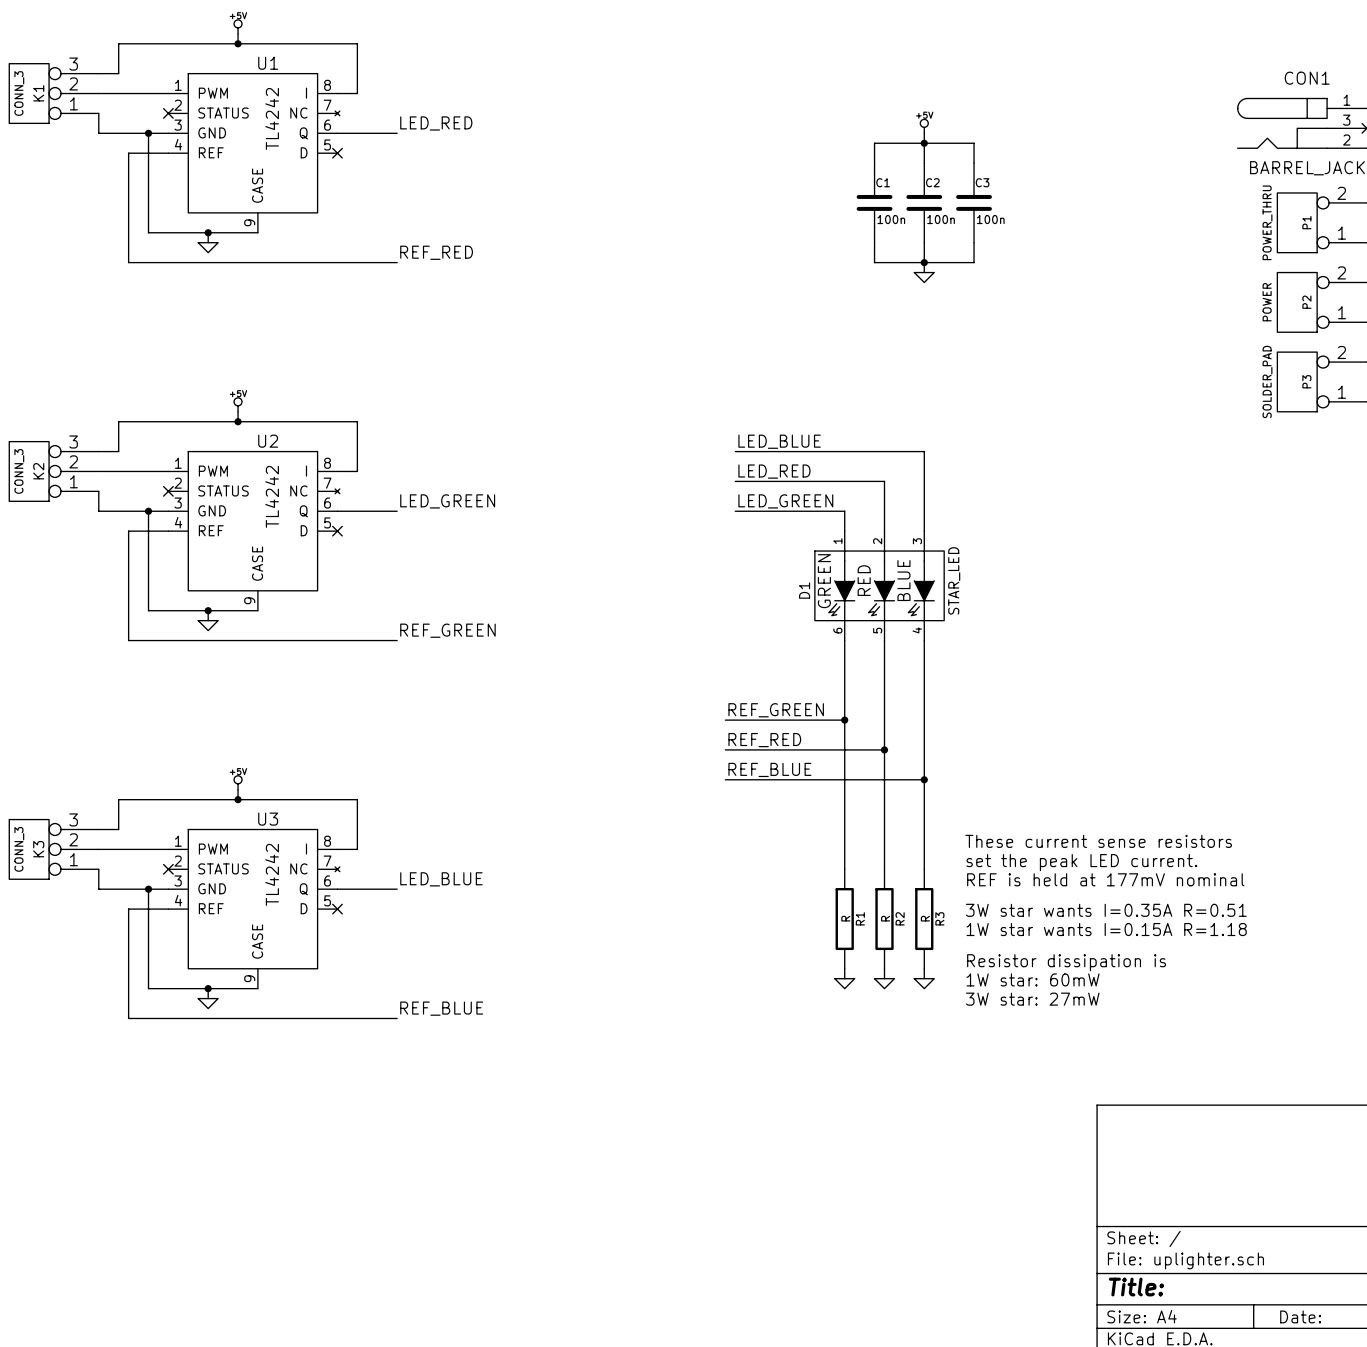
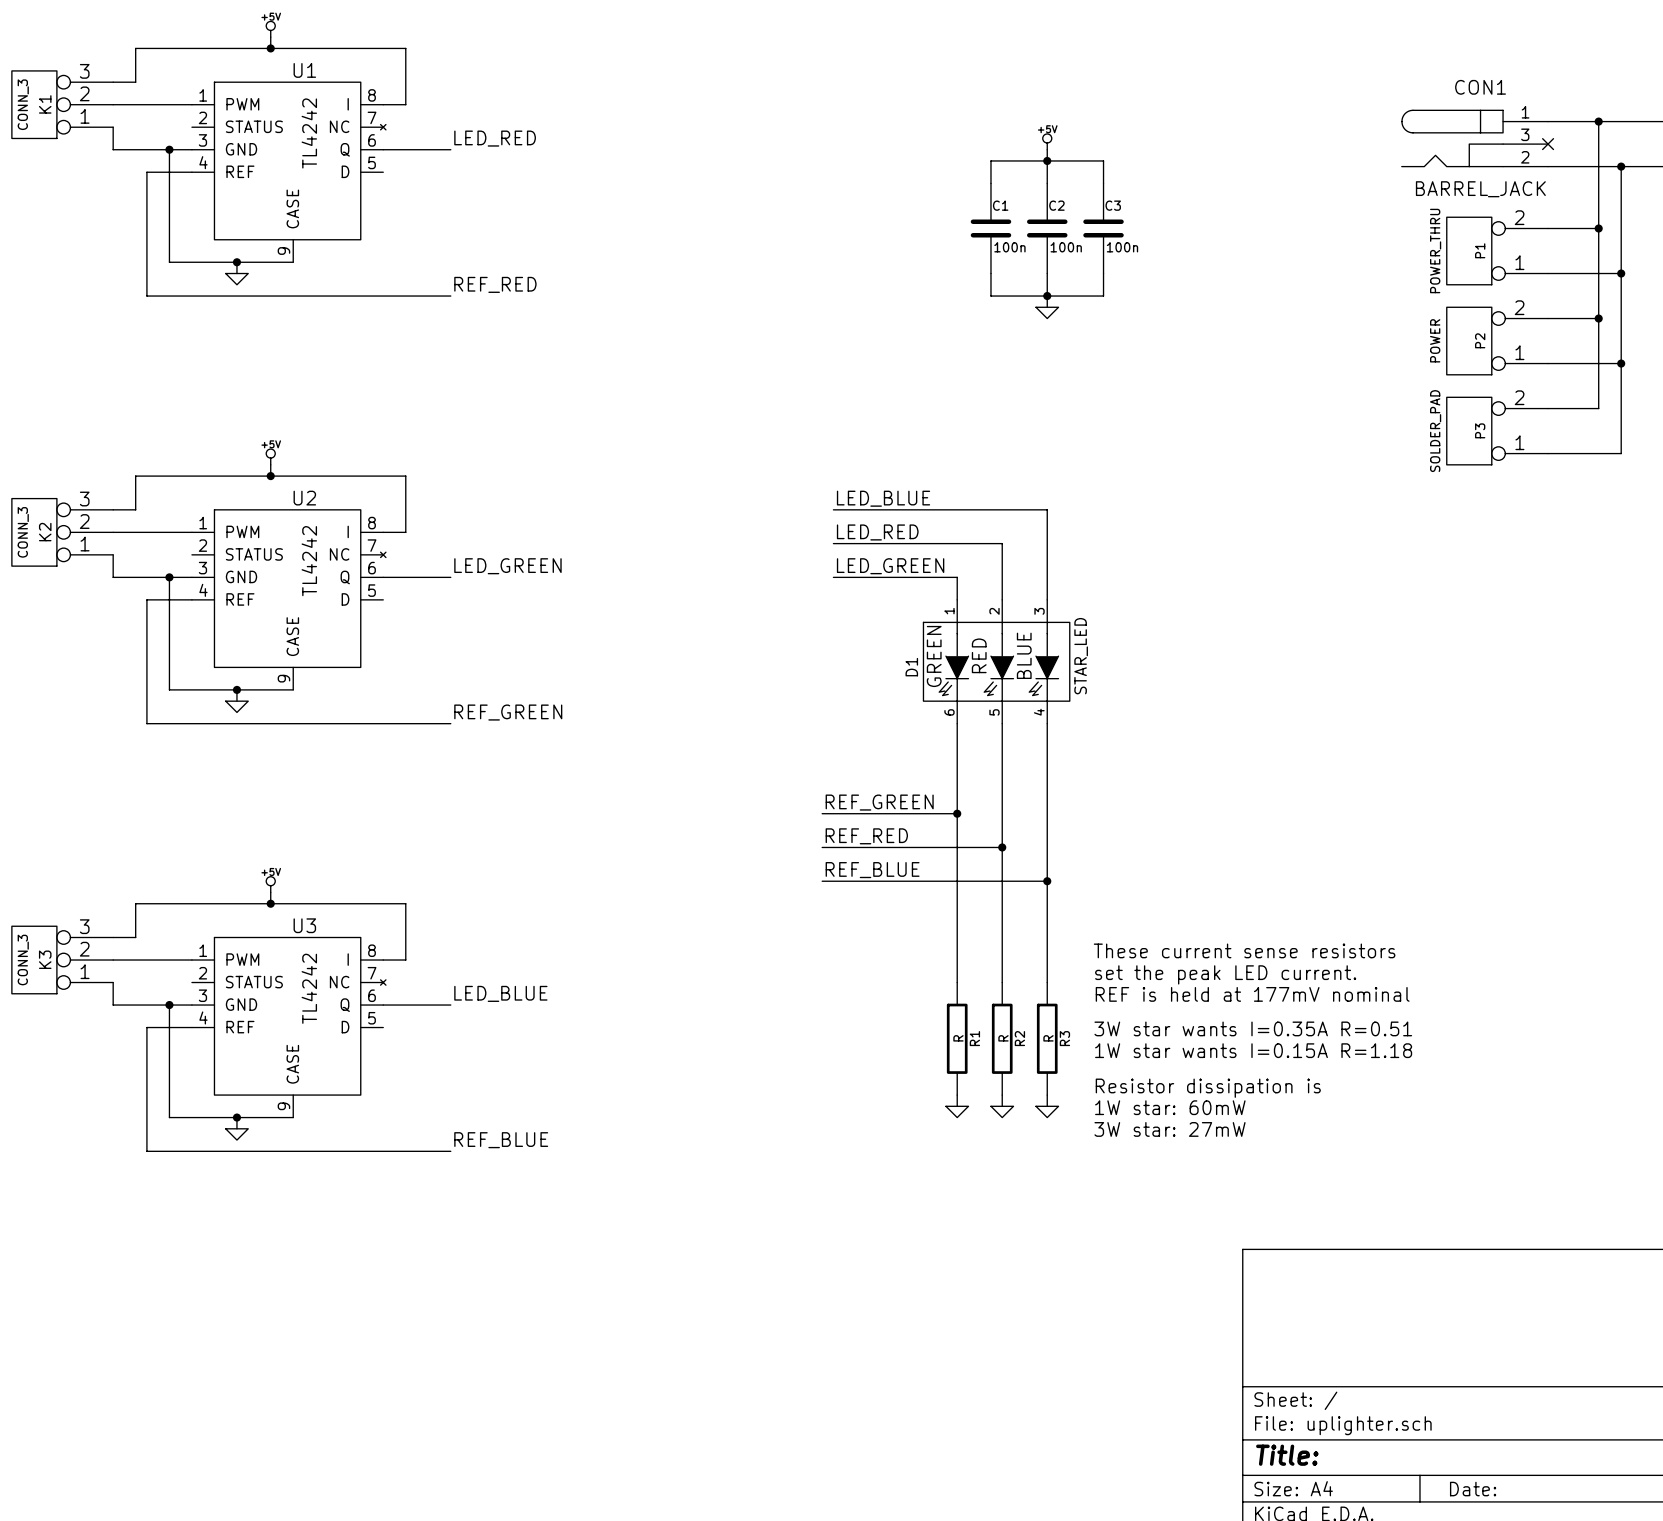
no-connect mark: (168, 113) -> none
no-connect mark: (337, 153) -> none
no-connect mark: (168, 491) -> none
no-connect mark: (337, 531) -> none
no-connect mark: (168, 869) -> none
no-connect mark: (337, 909) -> none

